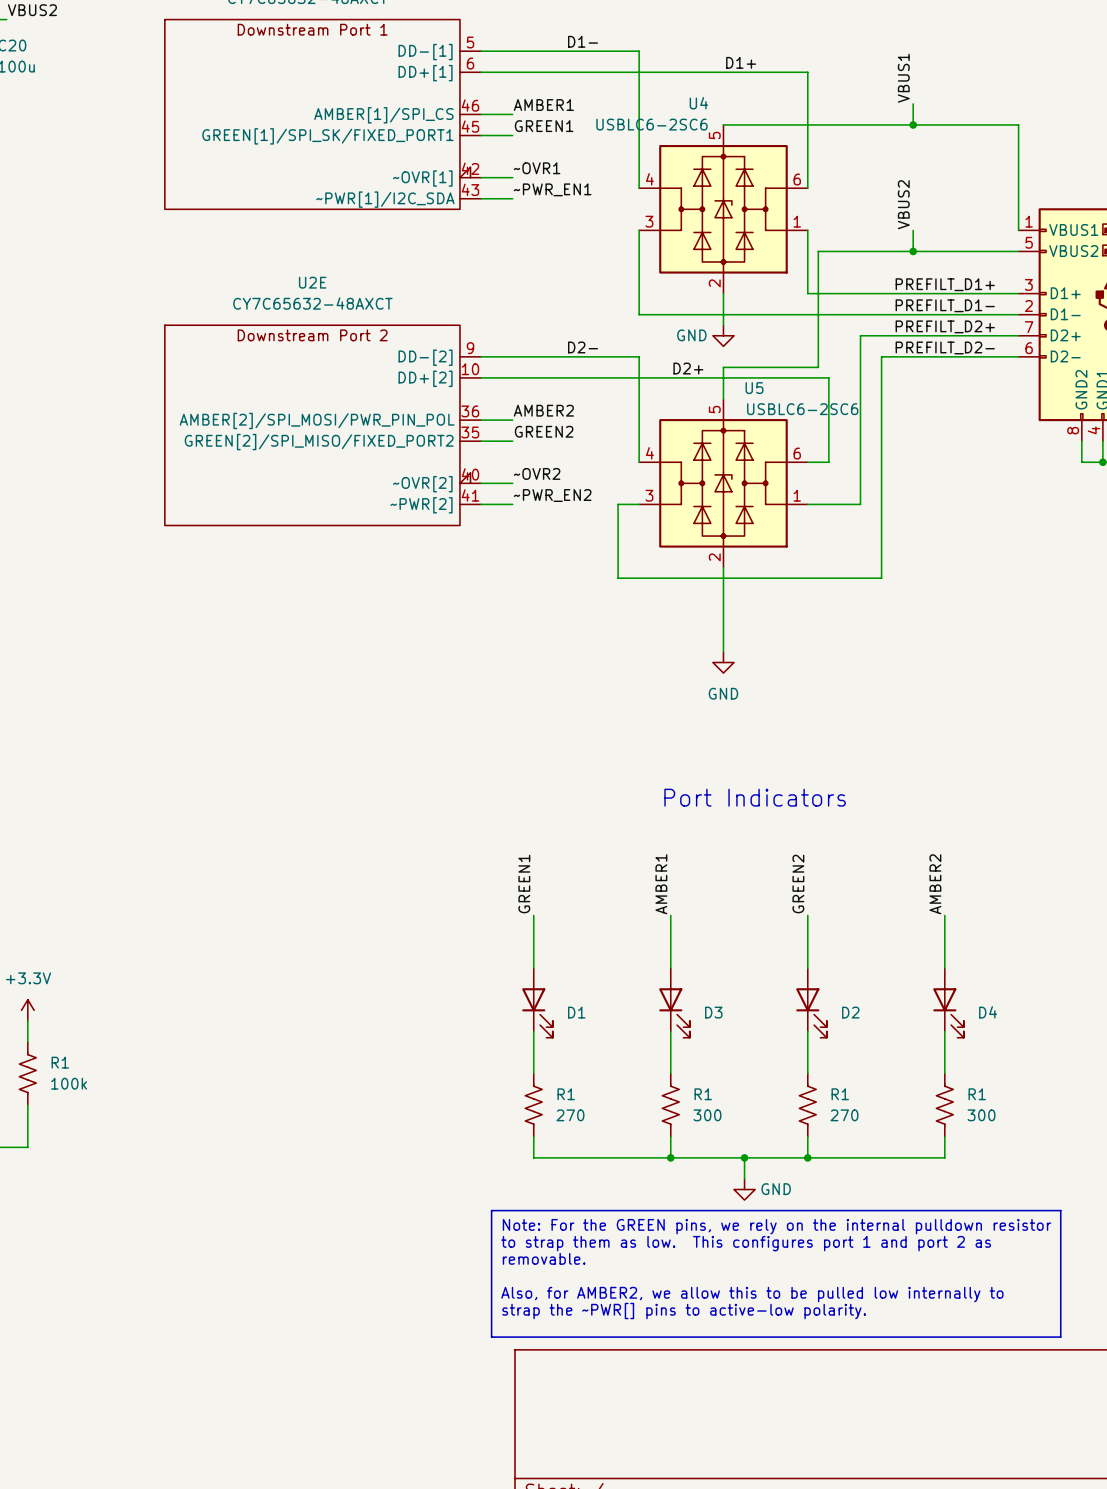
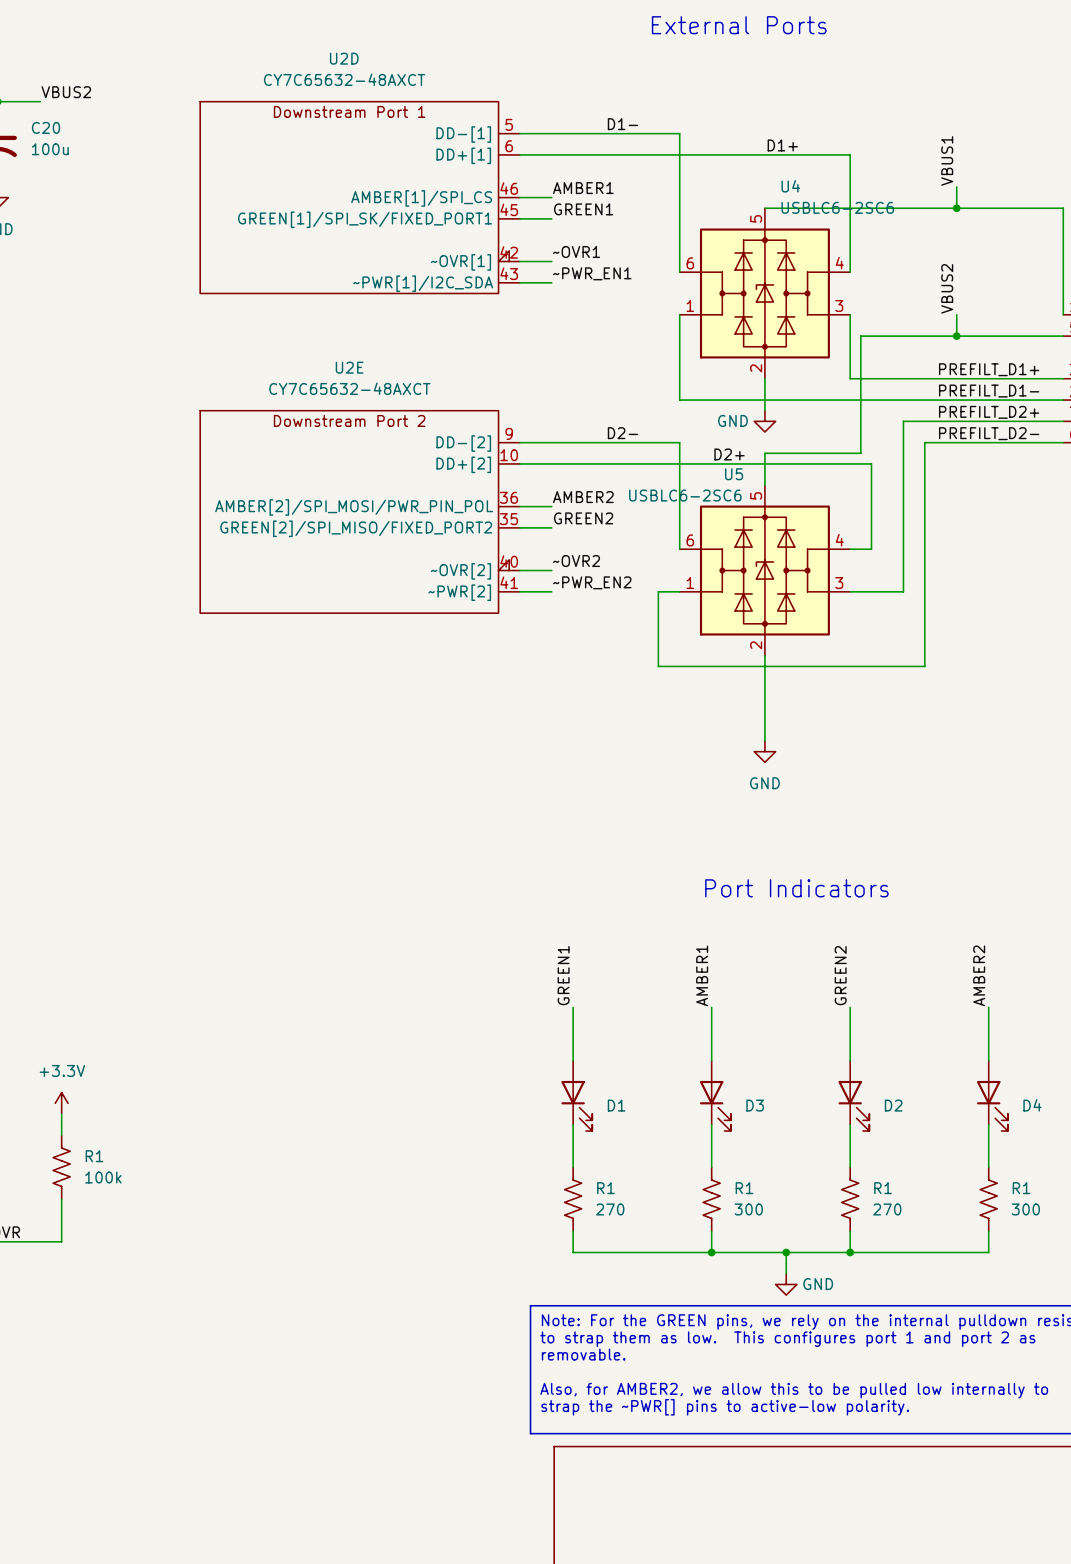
U4 flip: as is (723, 209) -> left-right (764, 293)
U5 flip: as is (723, 483) -> left-right (764, 570)

